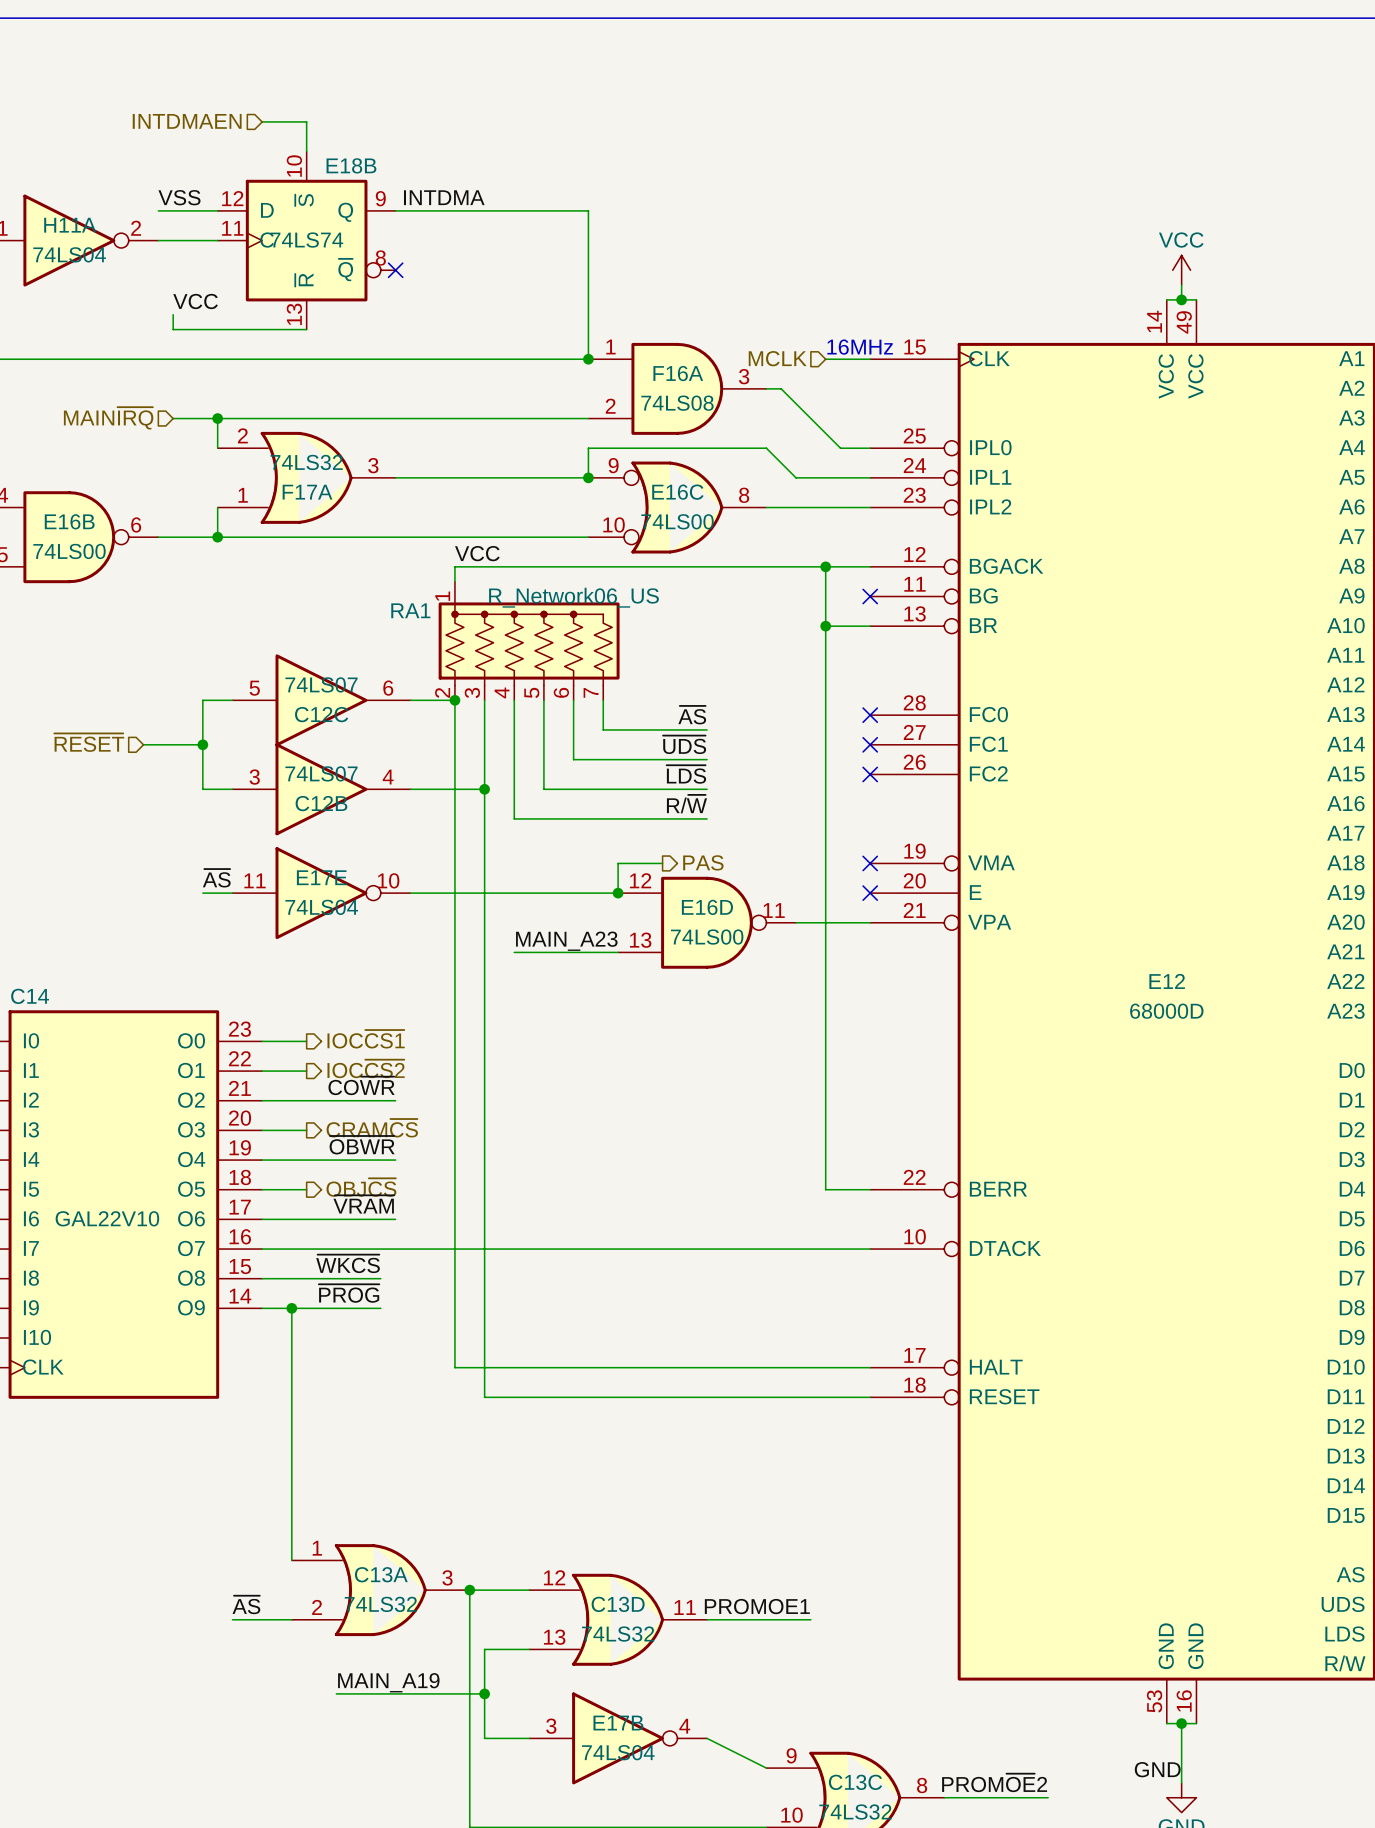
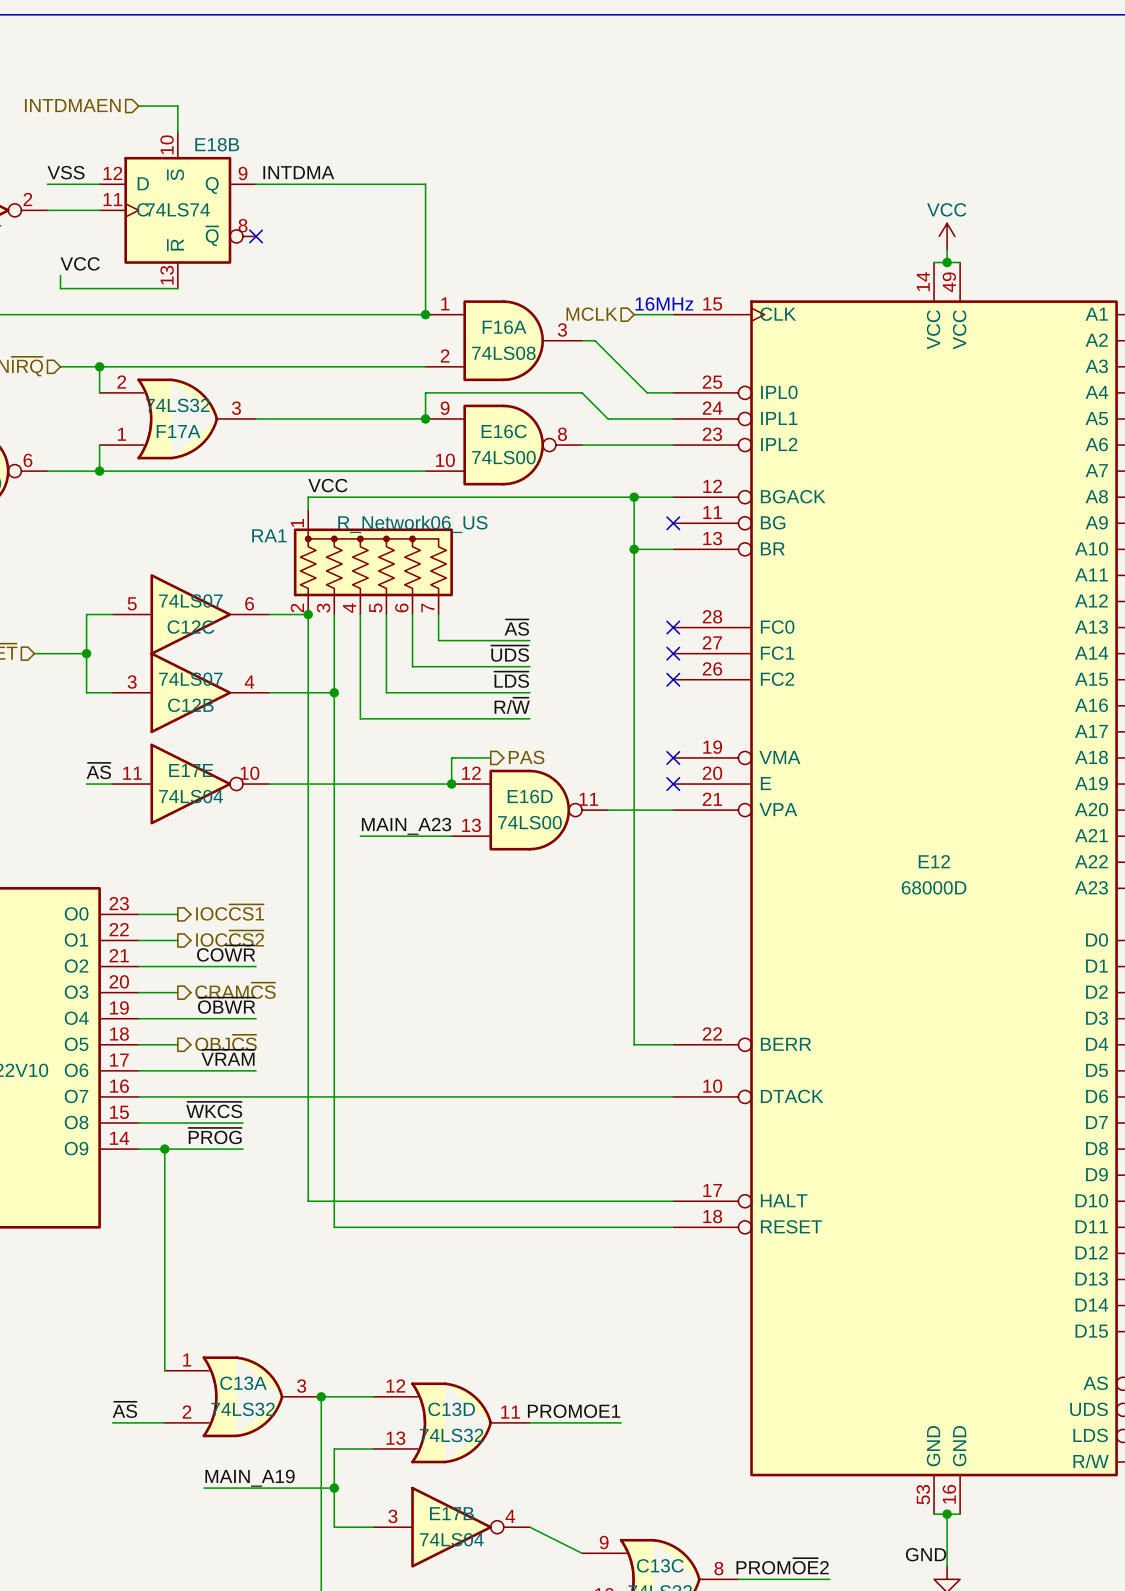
E16C symbol: [588, 461, 767, 554] -> [425, 404, 583, 486]

